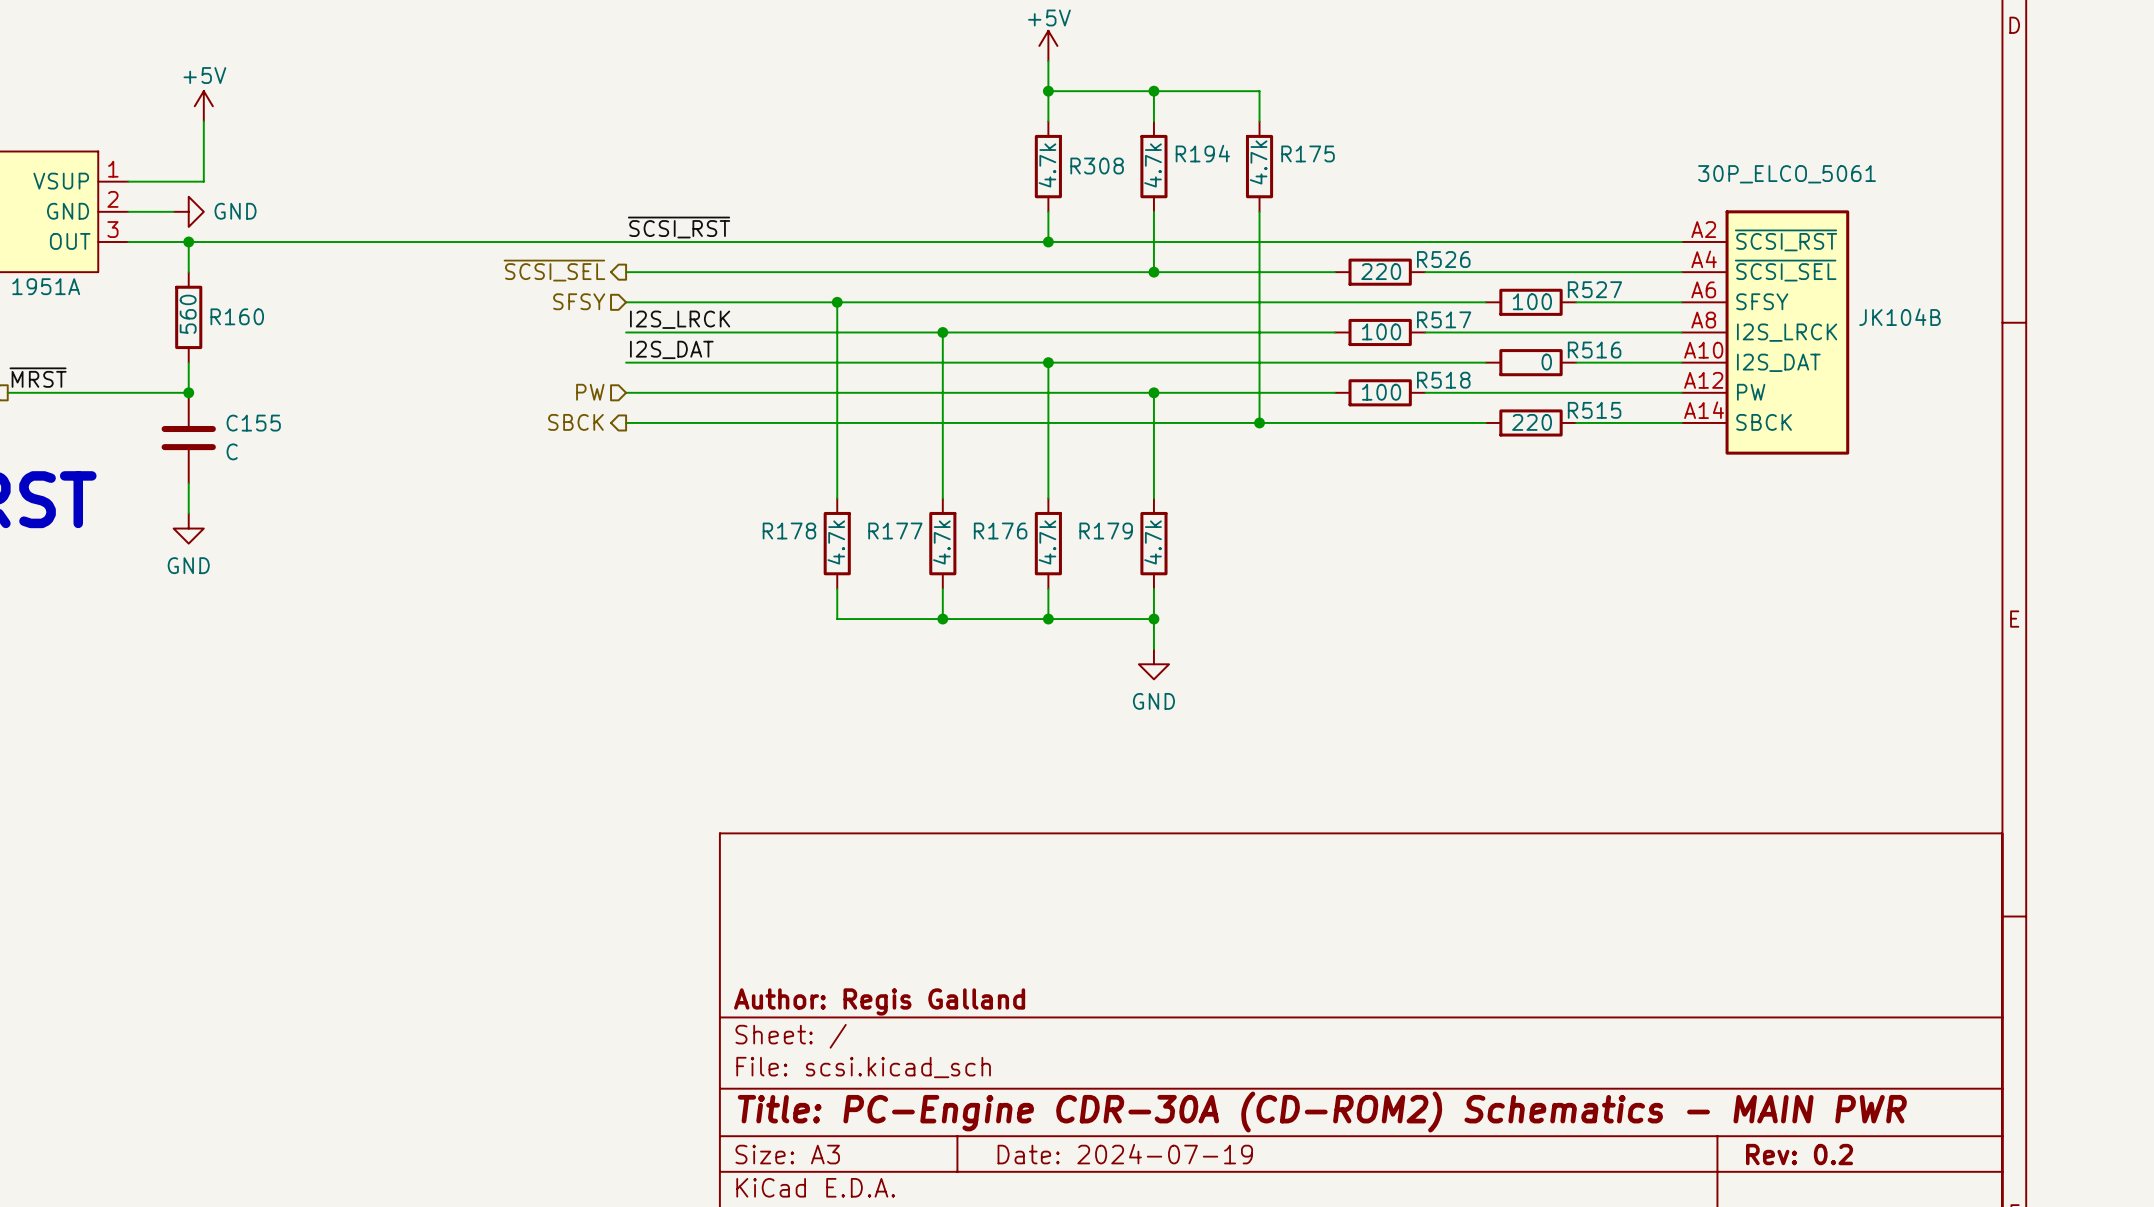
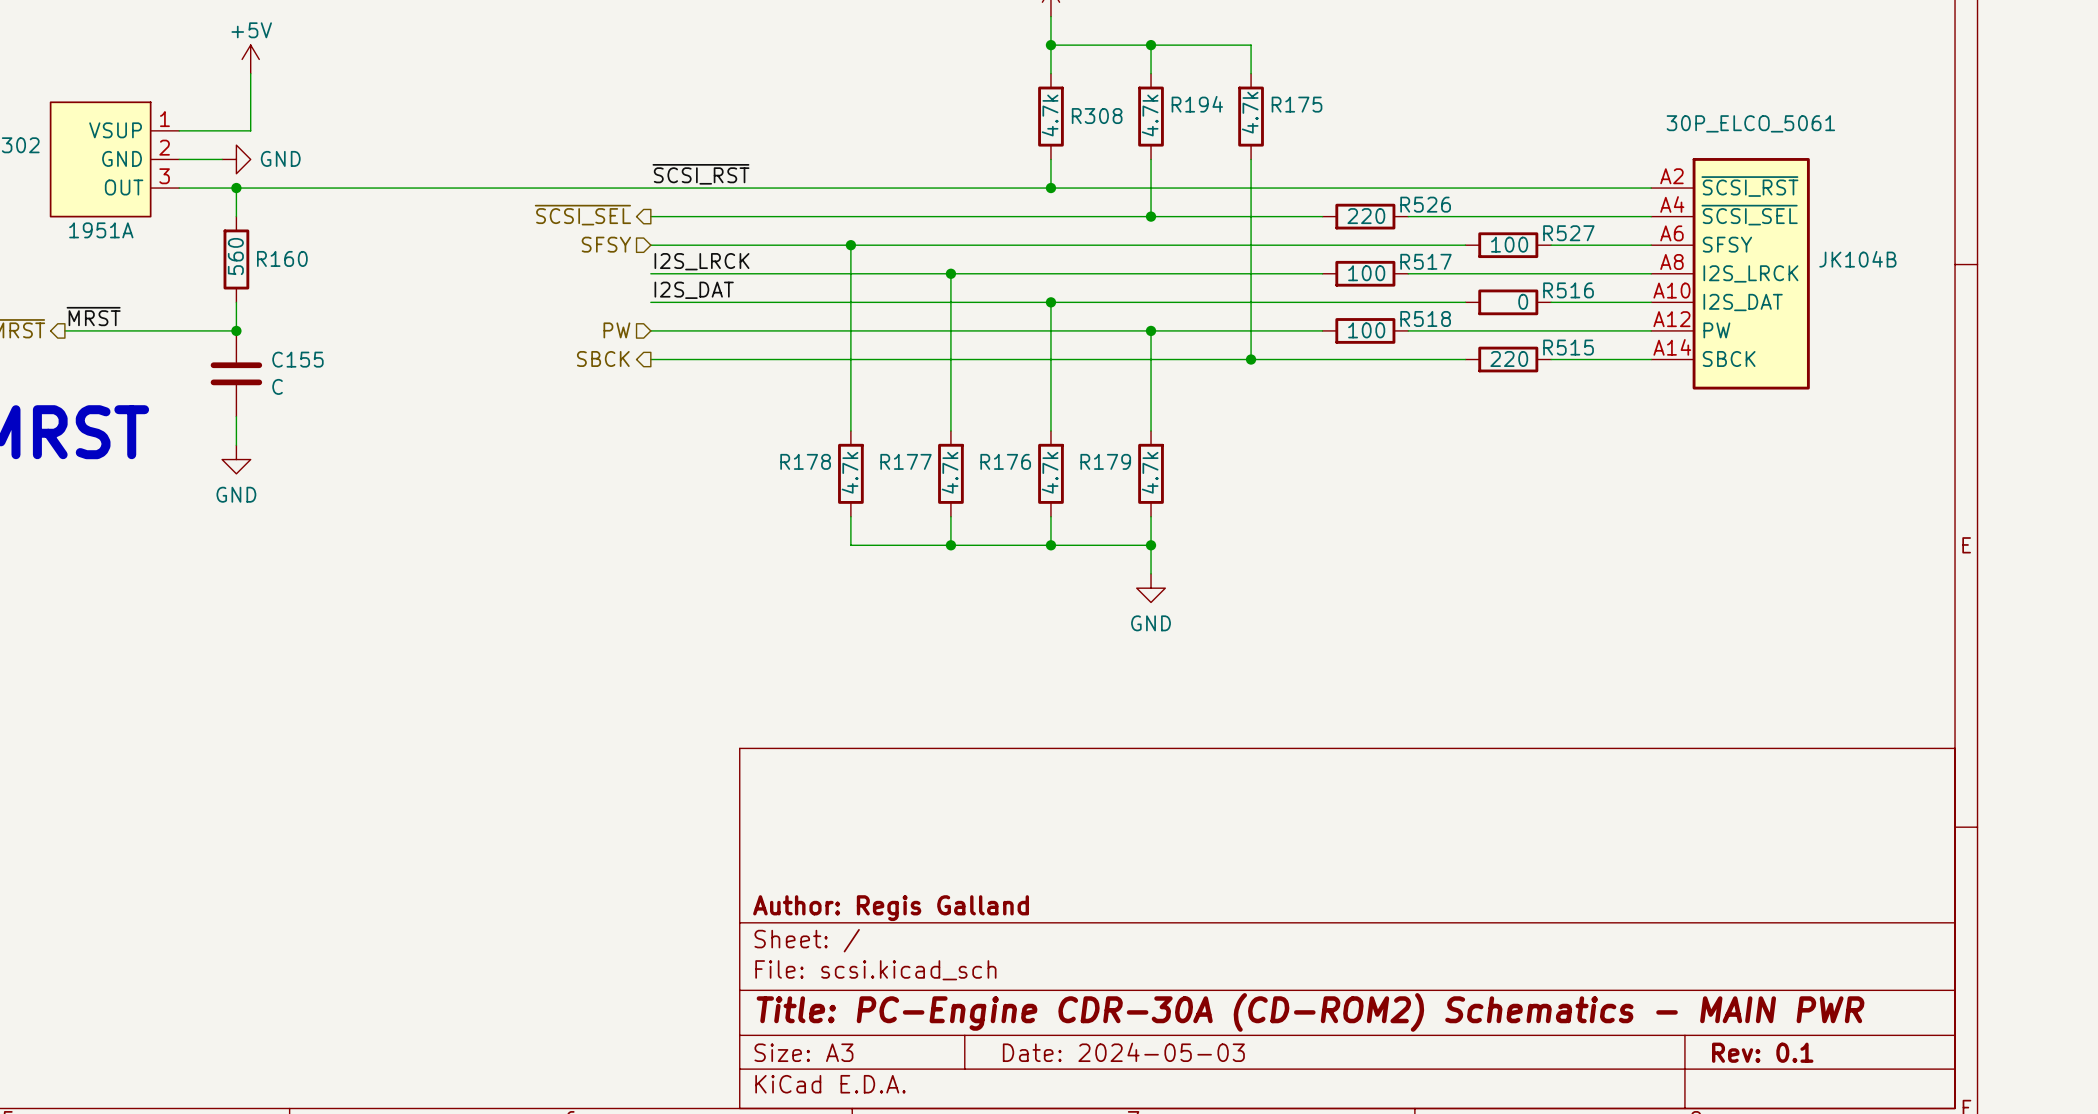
title block: Date: 2024-07-19 (1125, 1154) -> Date: 2024-05-03 (1123, 1052)
title block: Rev: 0.2 (1799, 1154) -> Rev: 0.1 (1762, 1052)

